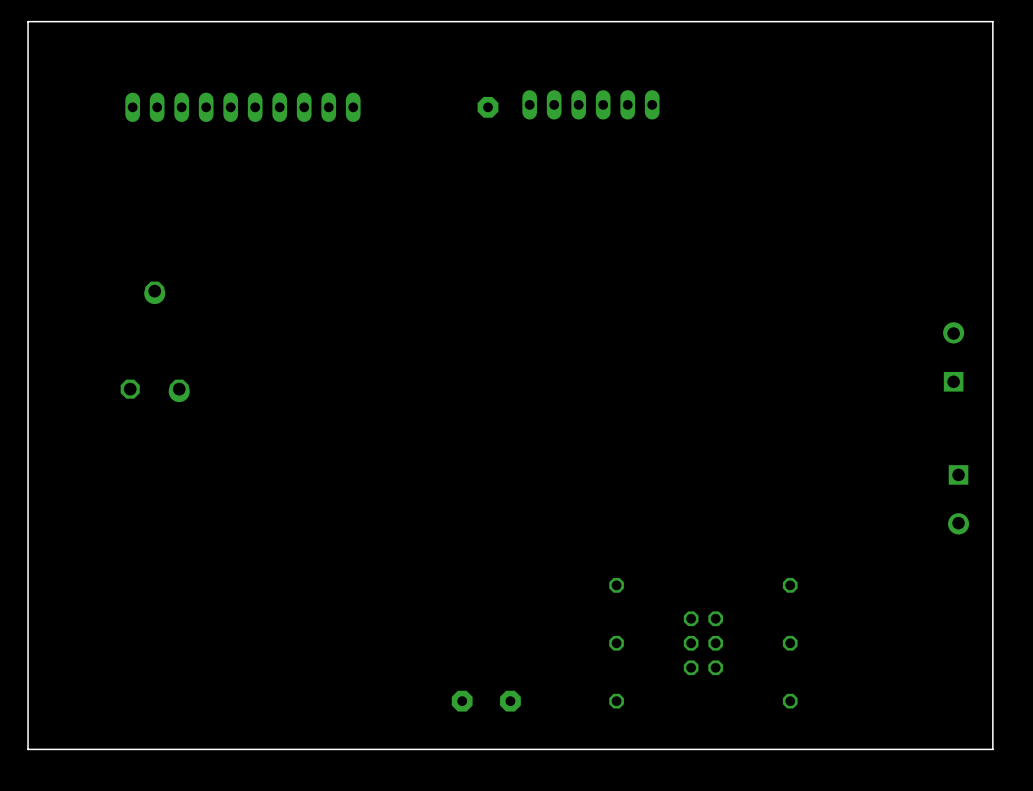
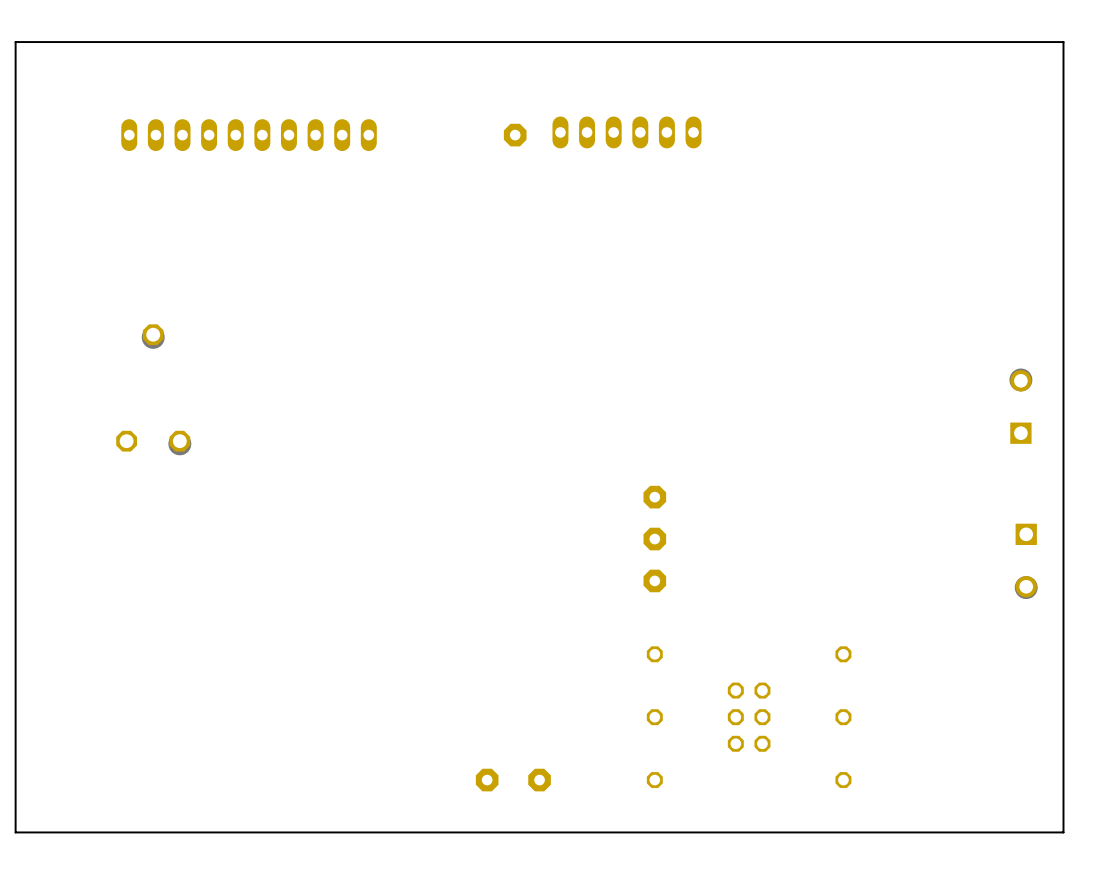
part: none -> (654, 497)
part: none -> (654, 539)
part: none -> (654, 580)

